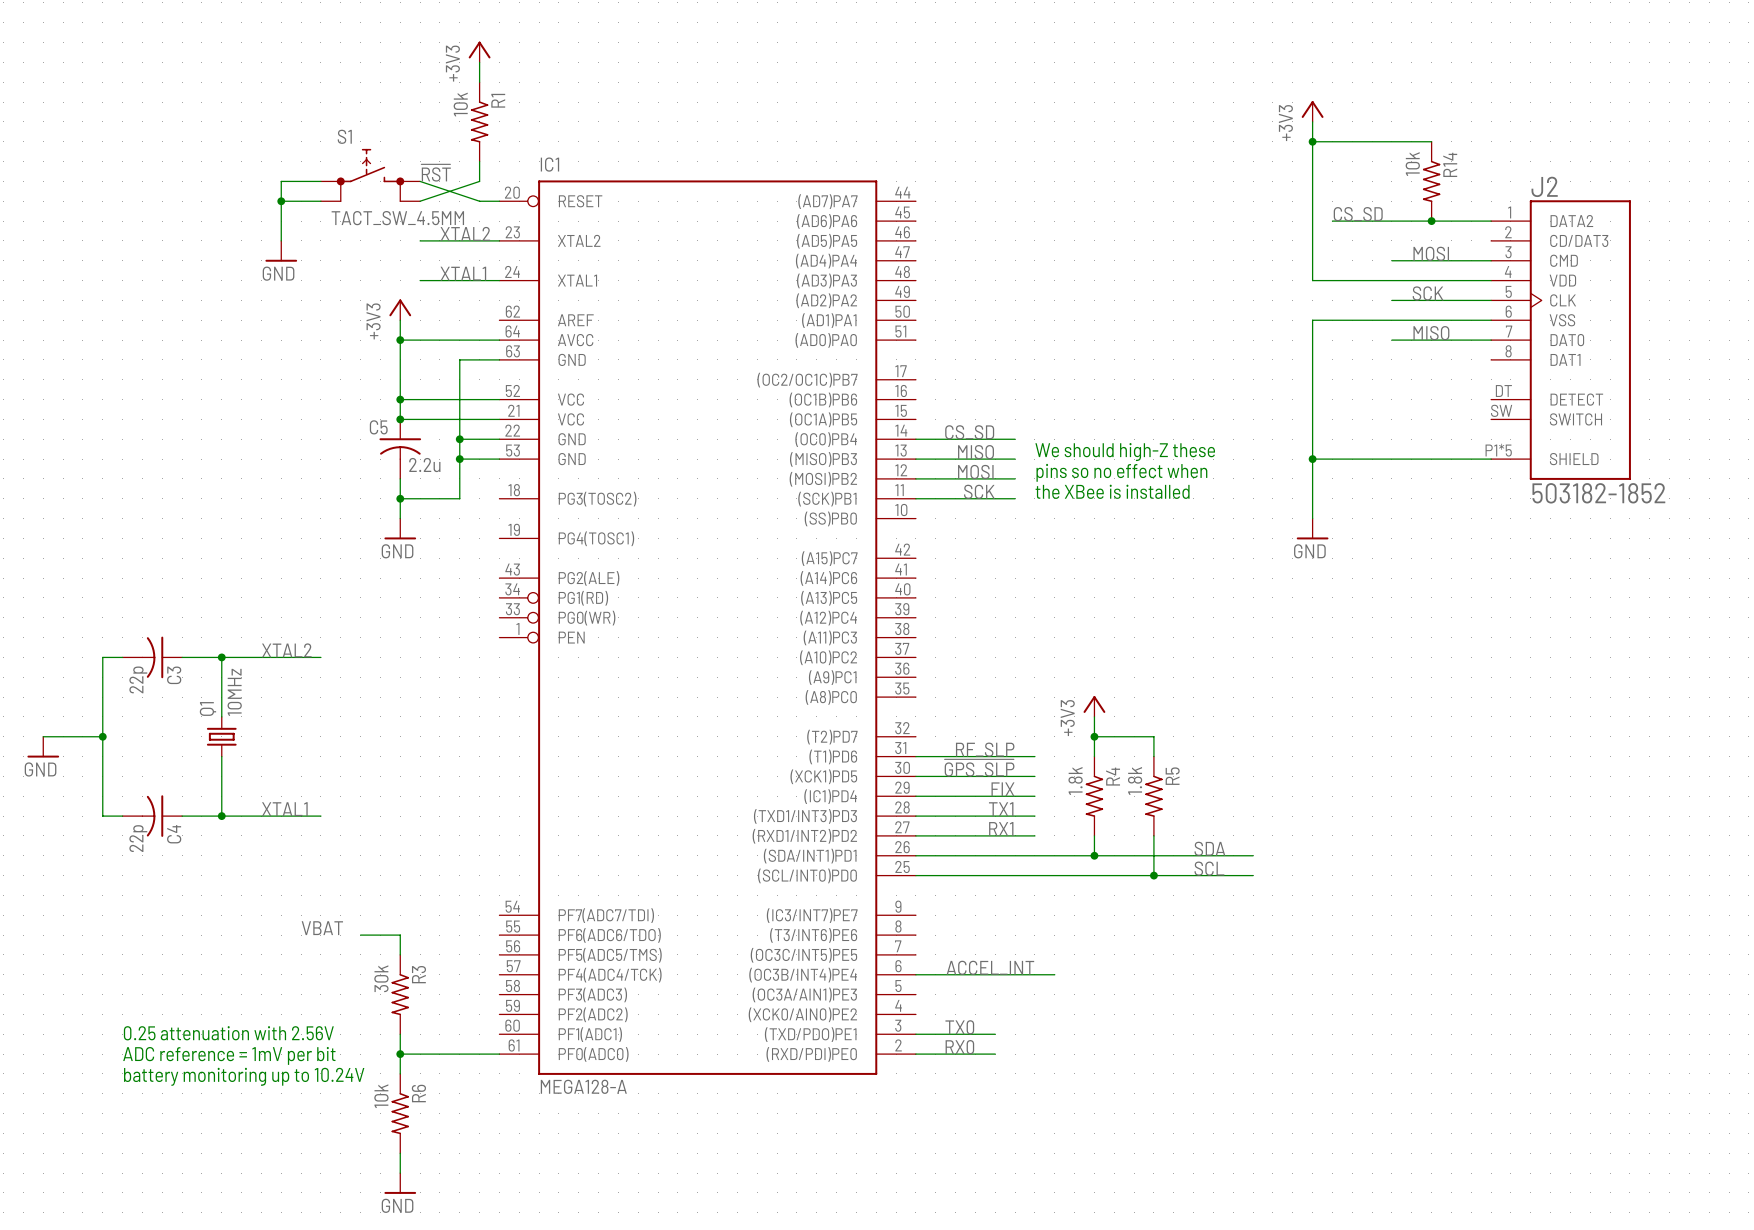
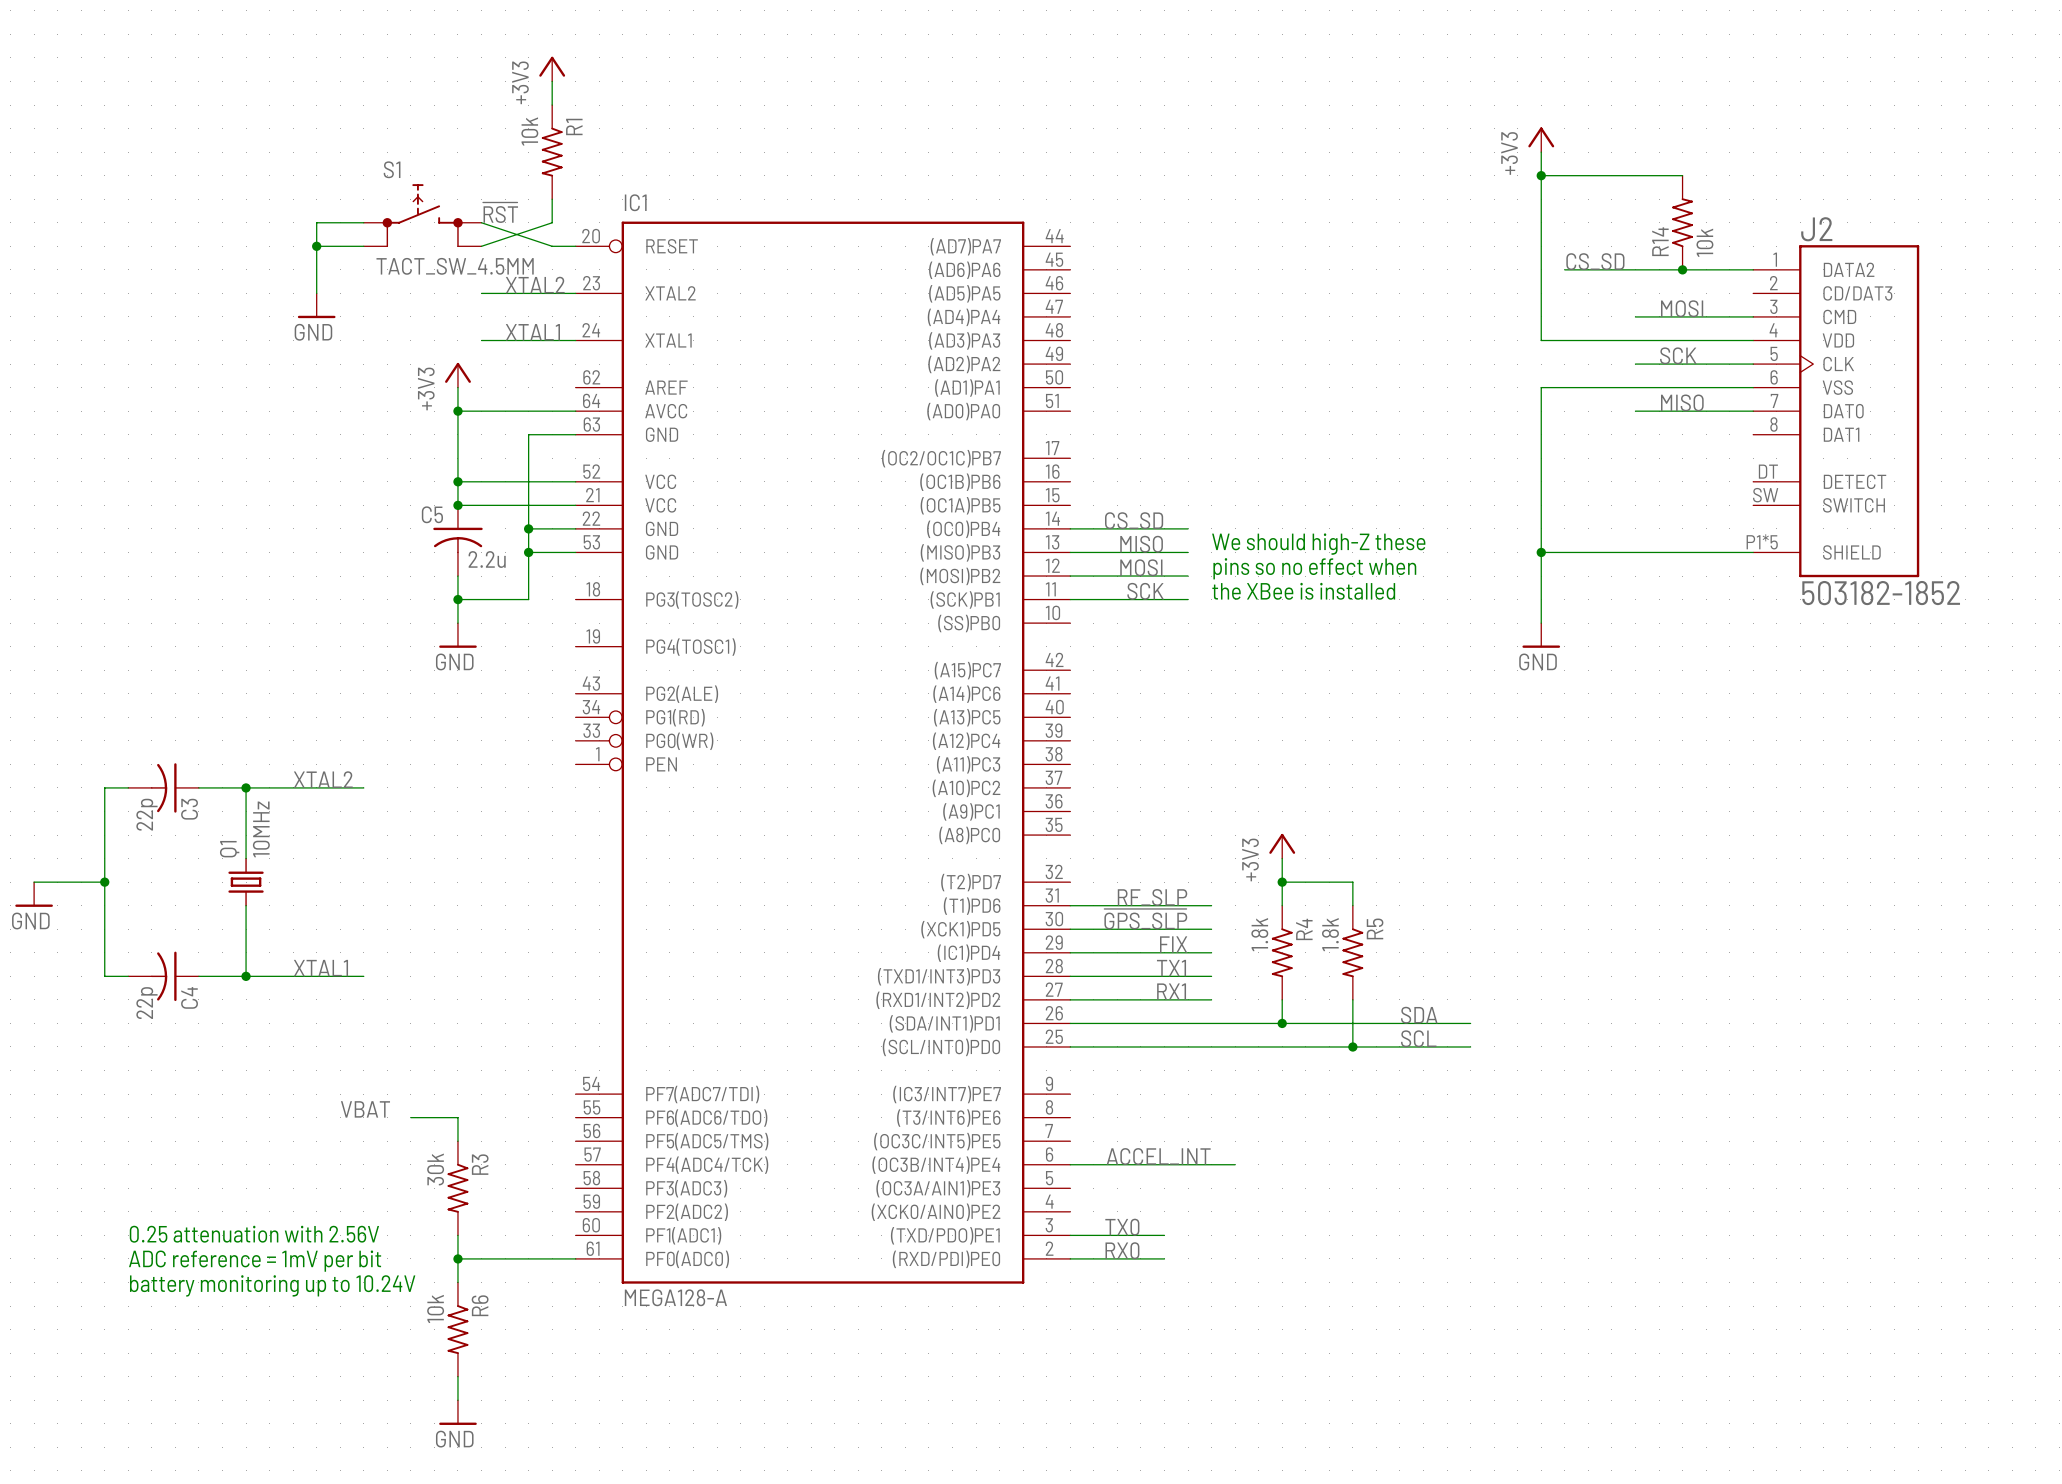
R14 rotation: 0° (1431, 181) -> 180° (1682, 222)

